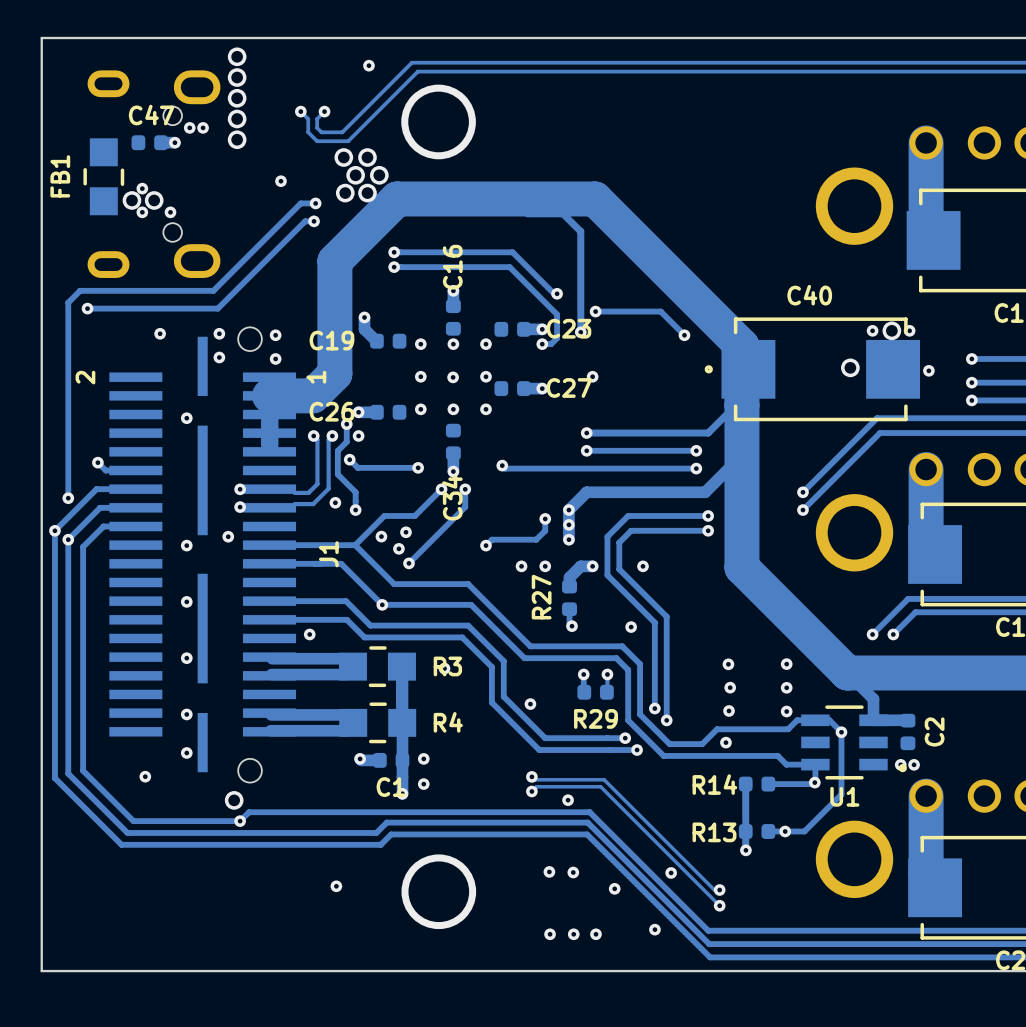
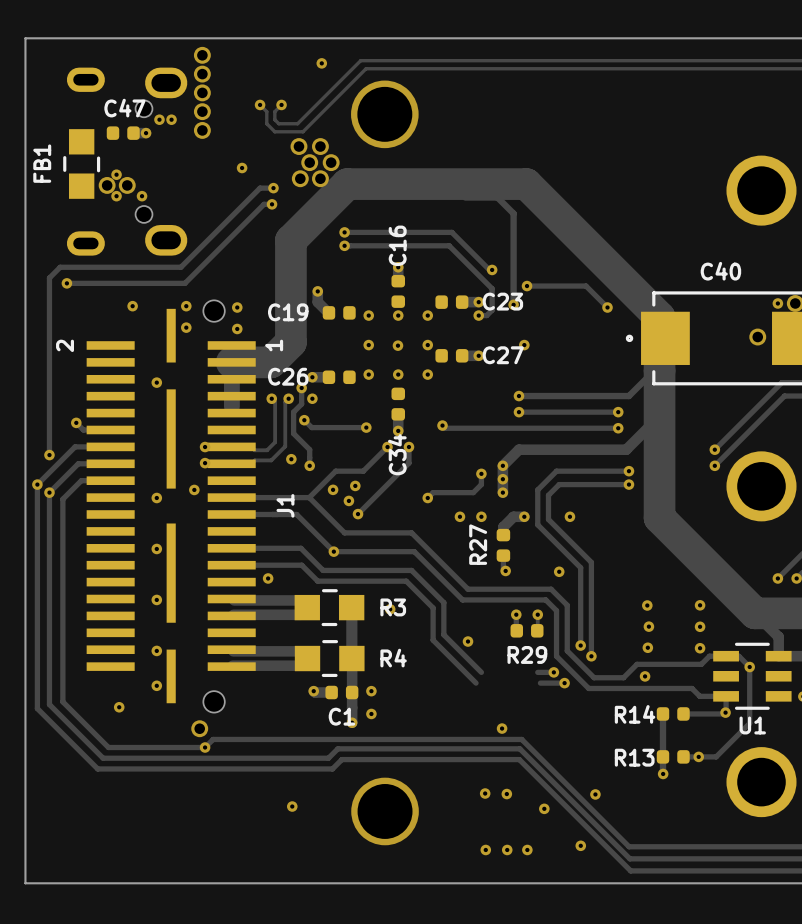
track: (607, 738) (545, 738) -> none
track: (610, 750) (539, 750) -> none
track: (531, 776) (534, 779) (604, 779) (714, 890) (719, 890) -> none
via: (531, 776) -> none
track: (531, 791) (536, 786) (600, 786) (719, 905) -> none
via: (531, 791) -> none
via: (719, 890) -> none
via: (719, 905) -> none

